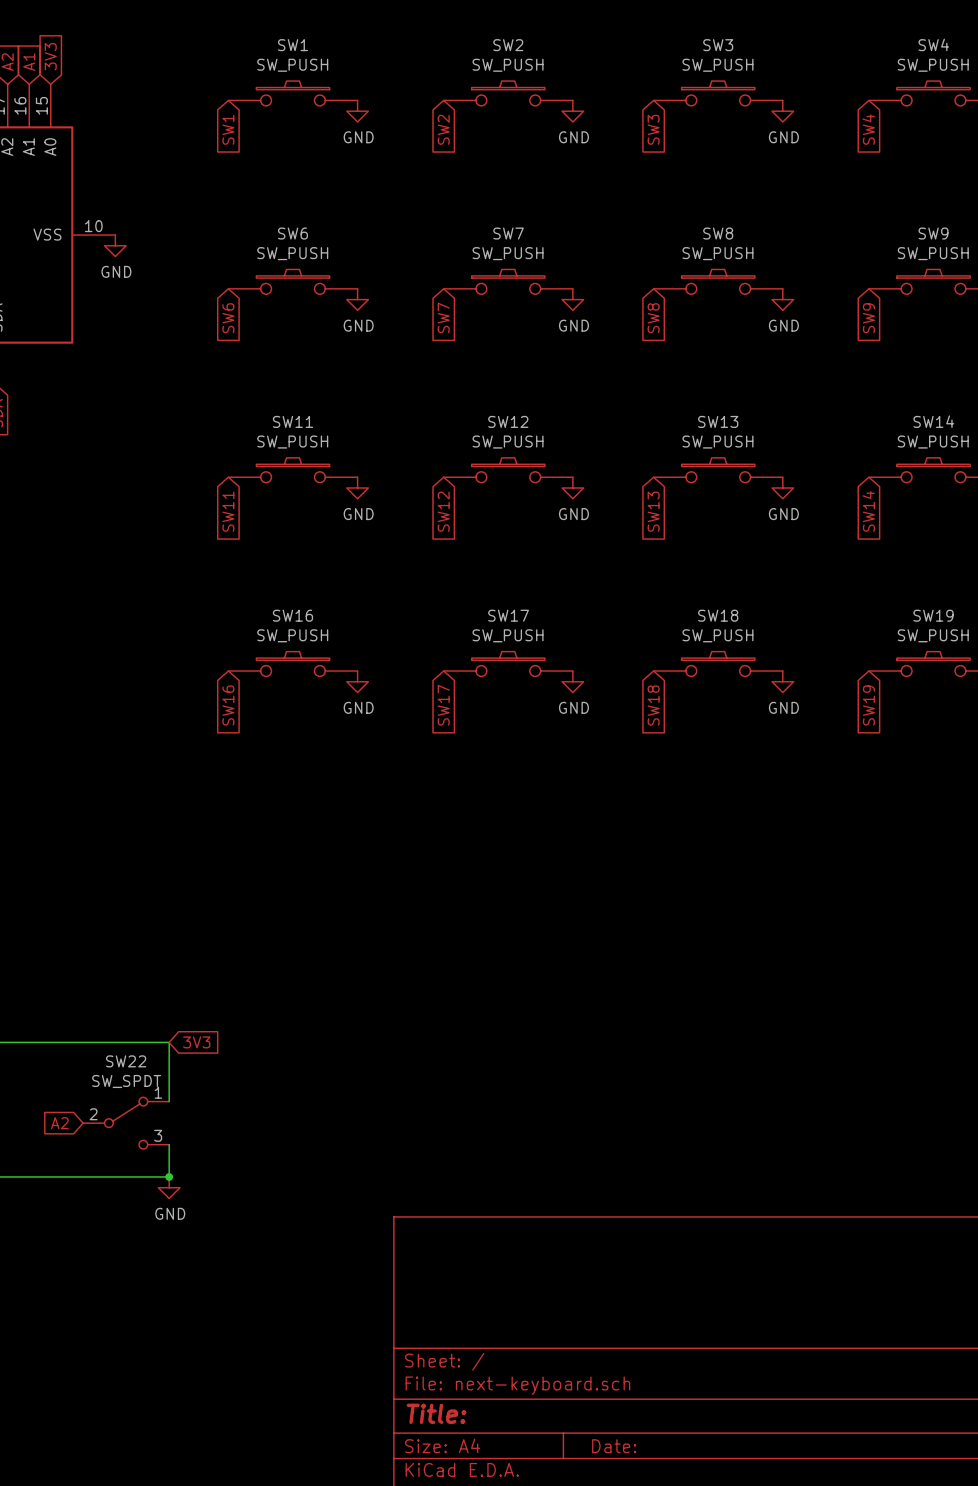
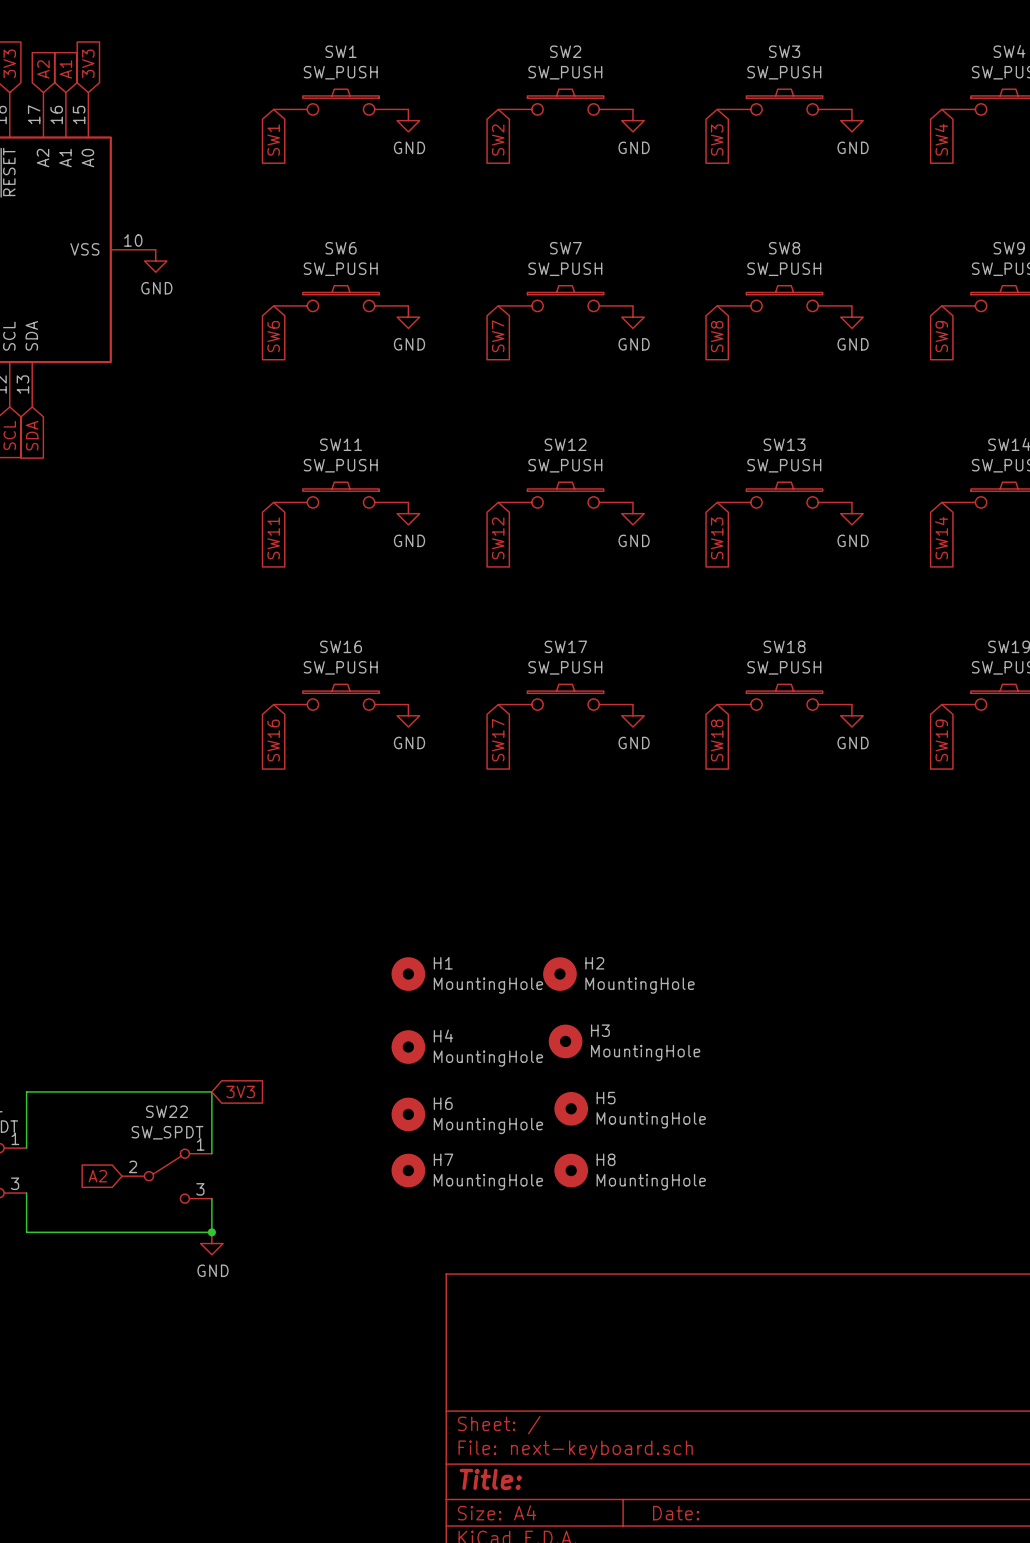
H1: none -> MountingHole (408, 974)
H2: none -> MountingHole (559, 974)
H3: none -> MountingHole (565, 1041)
H4: none -> MountingHole (408, 1047)
H5: none -> MountingHole (571, 1108)
H6: none -> MountingHole (408, 1114)
H7: none -> MountingHole (408, 1170)
H8: none -> MountingHole (571, 1170)

